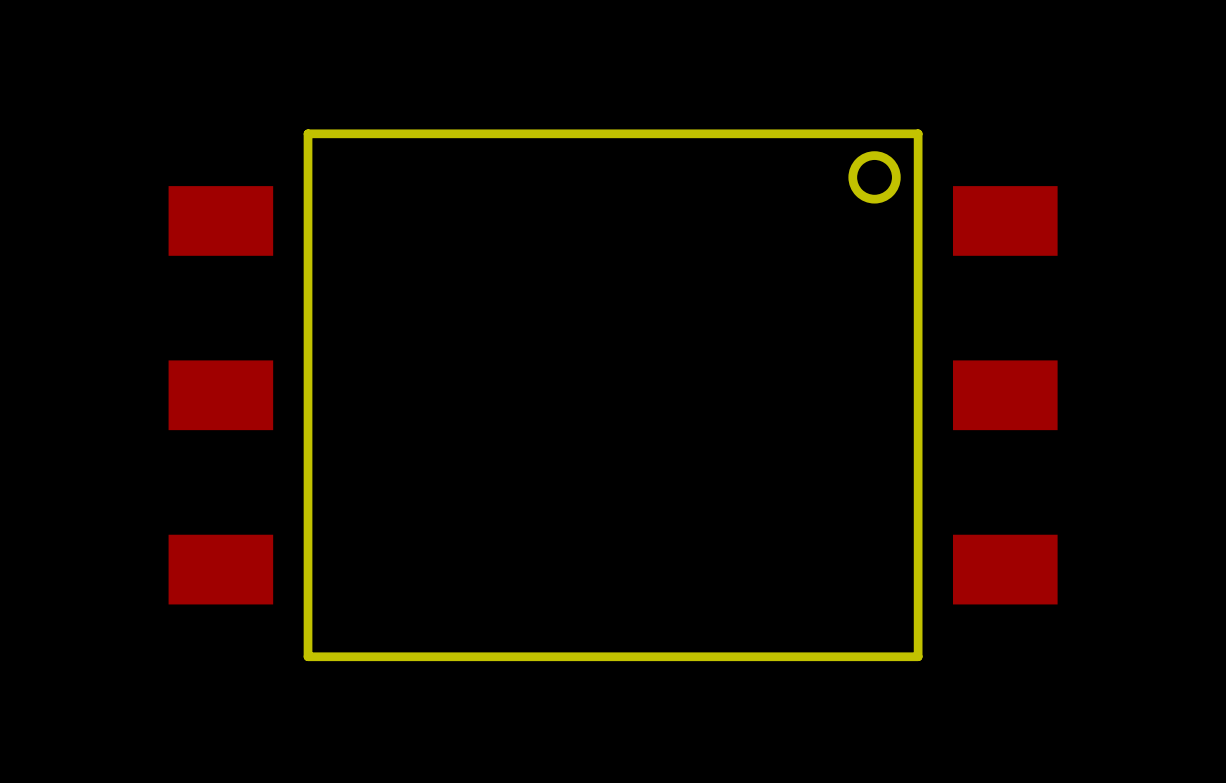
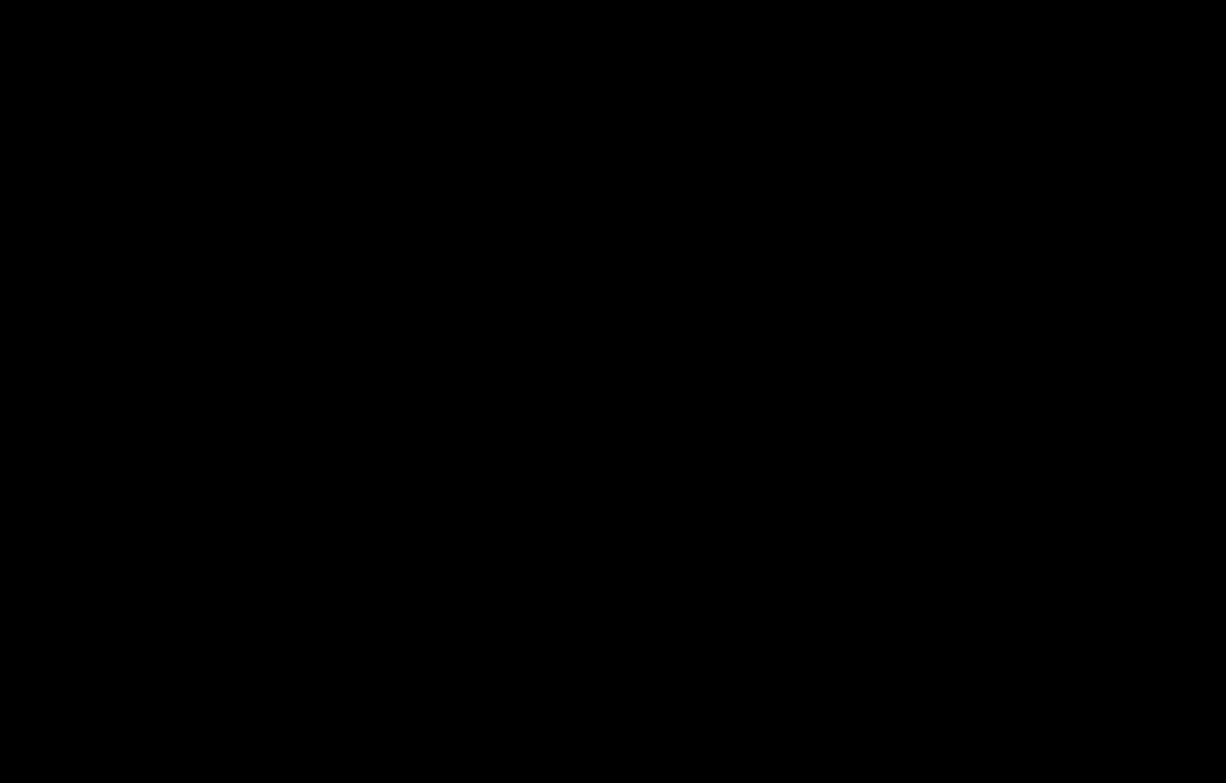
part: (613, 395) -> none

